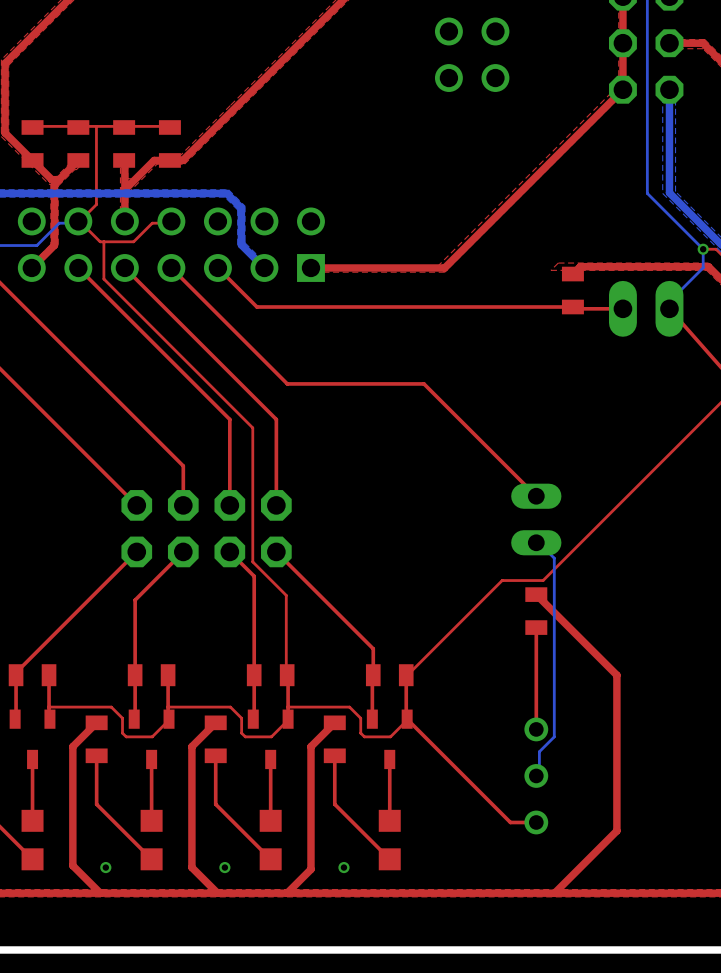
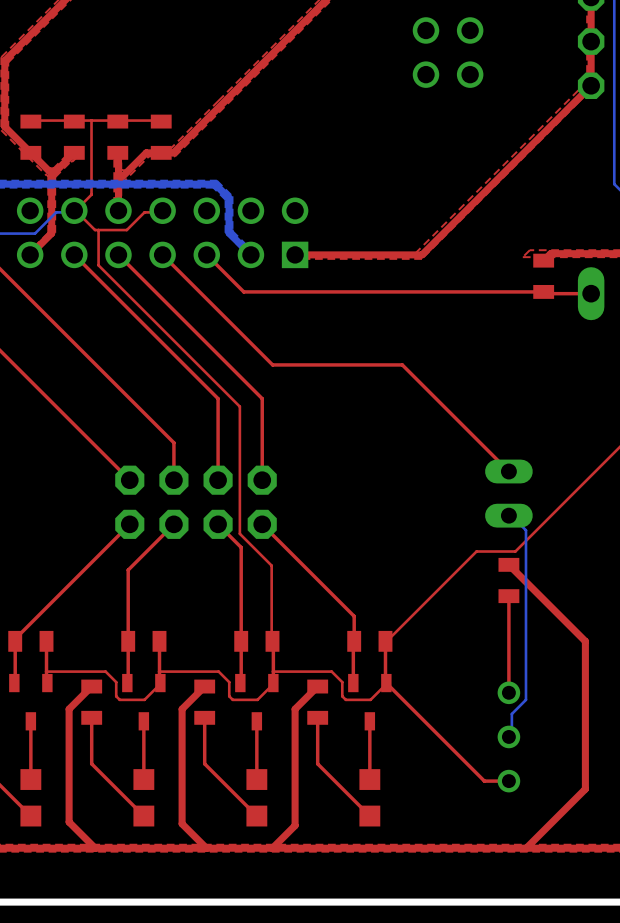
via: (105, 867) -> none
via: (224, 867) -> none
via: (343, 867) -> none

